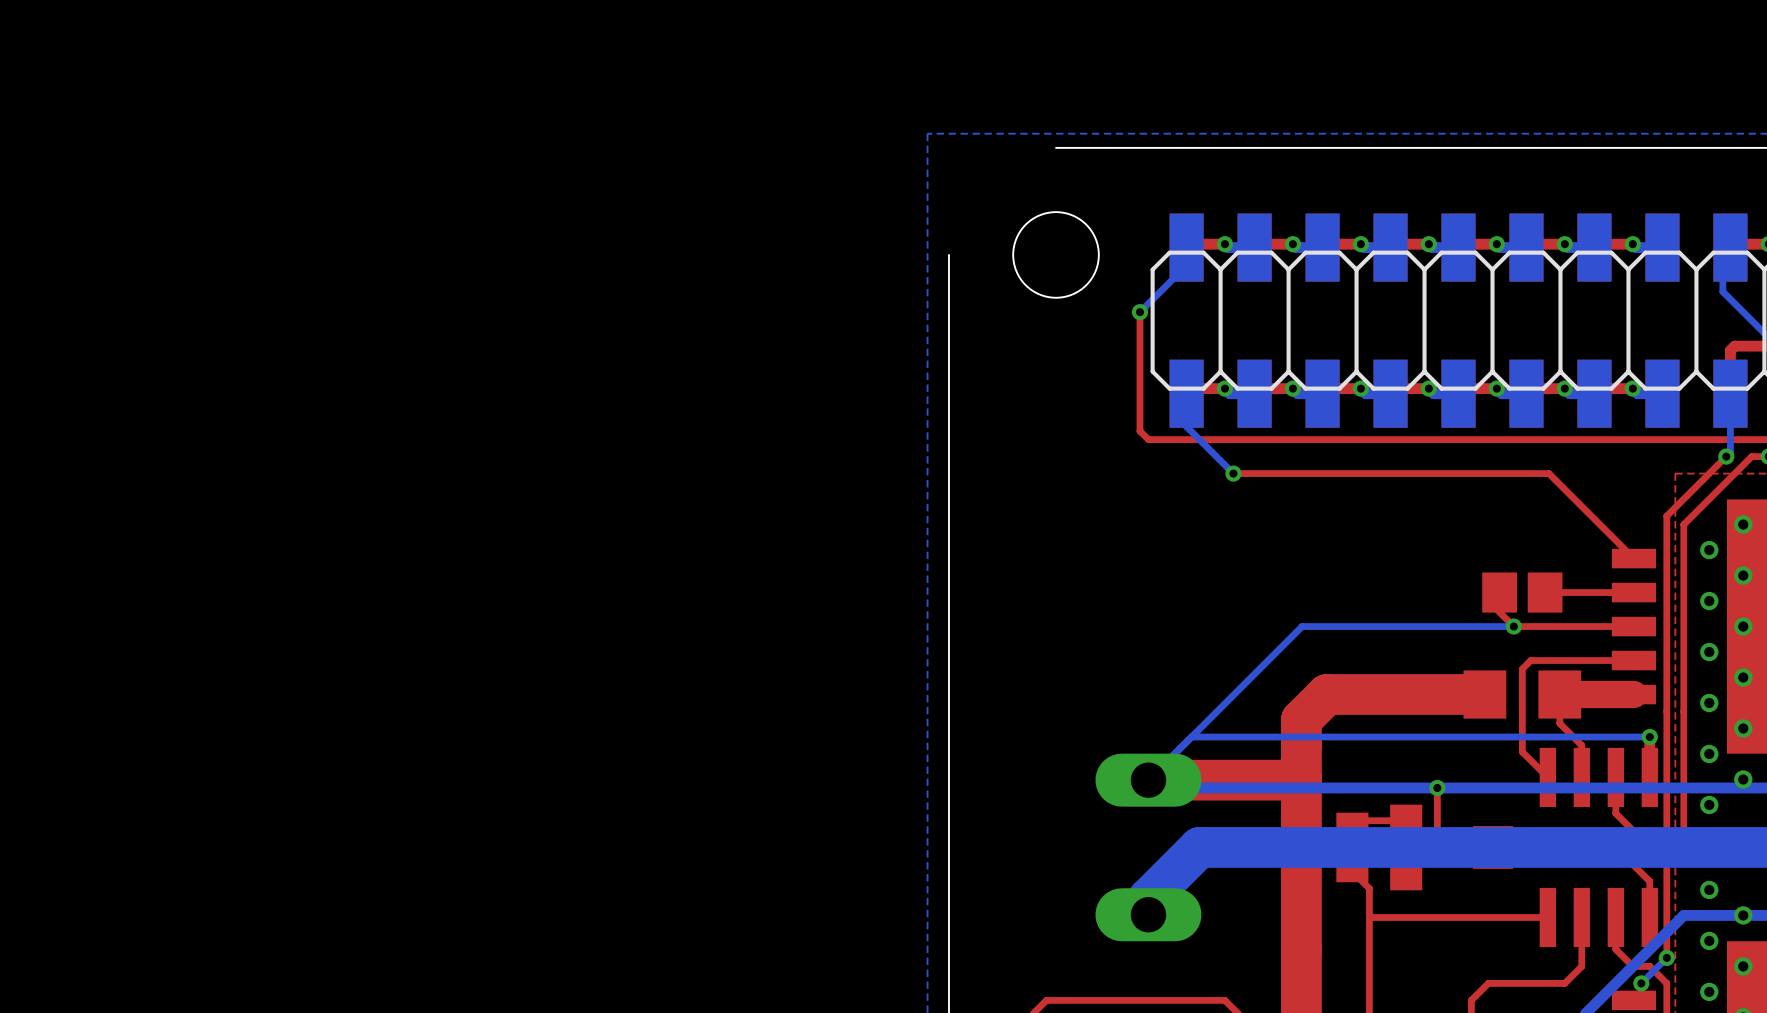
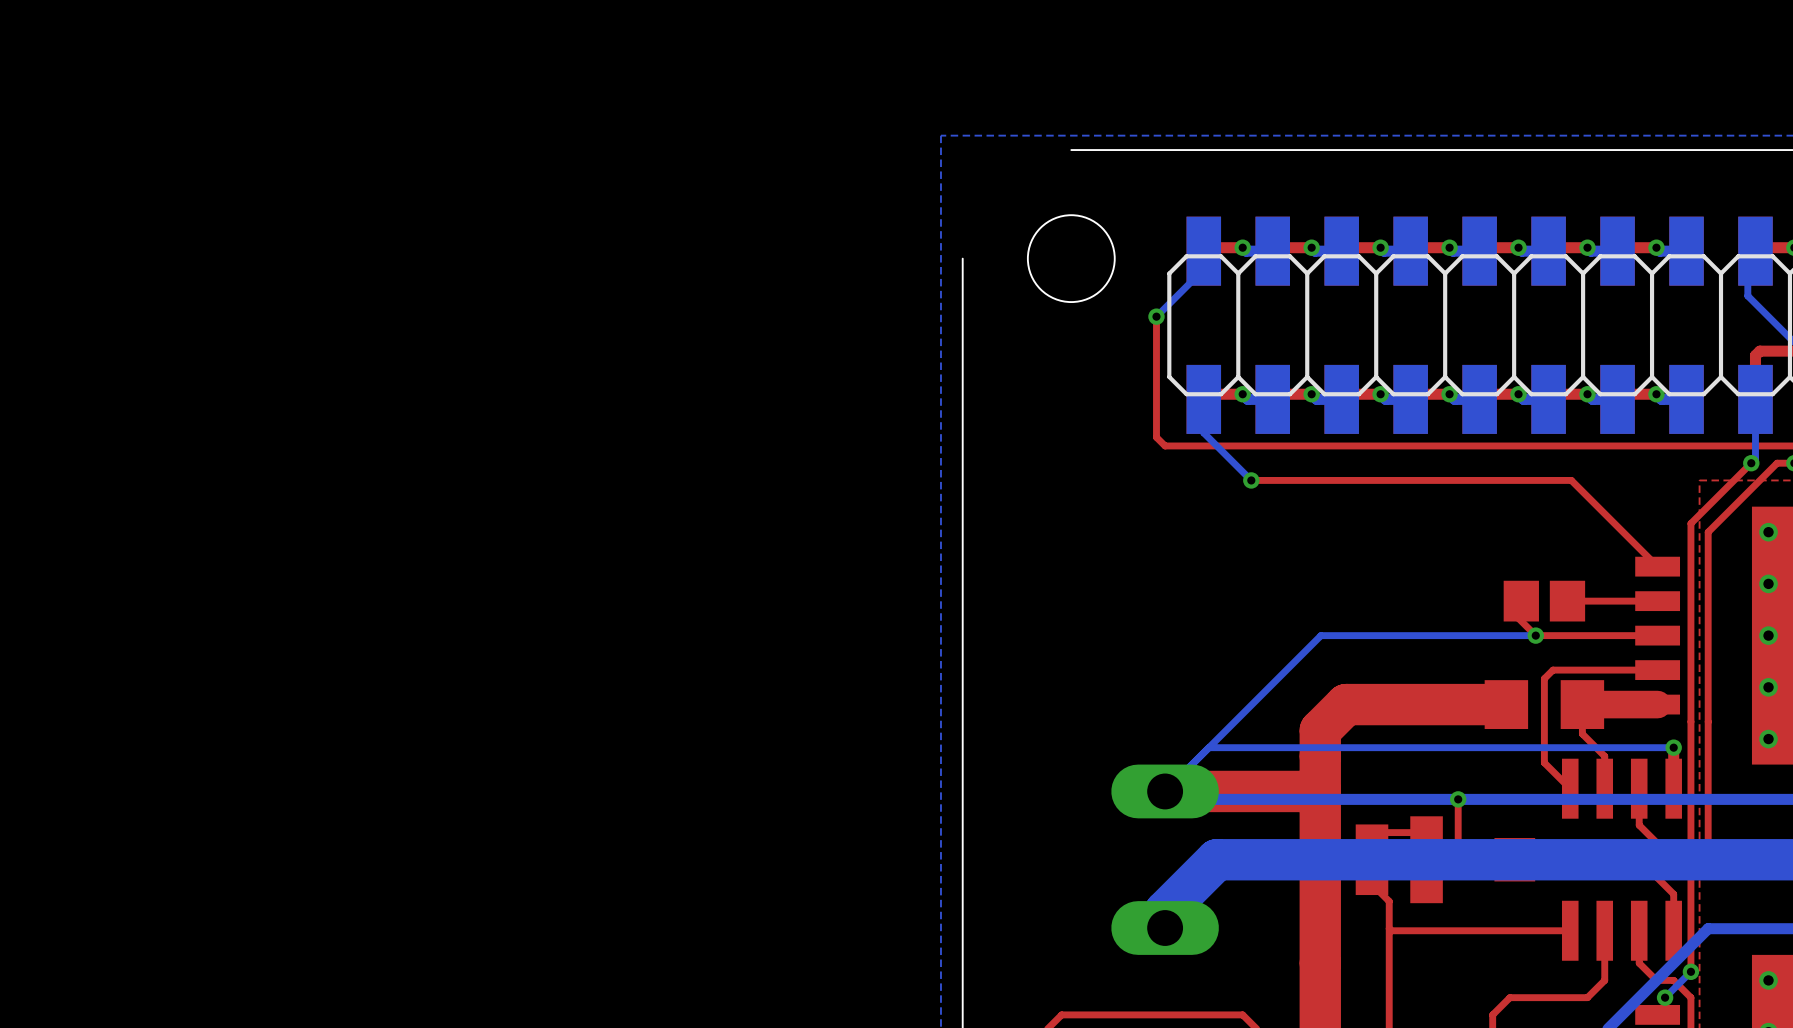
via: (1709, 550) -> none
via: (1709, 601) -> none
via: (1709, 652) -> none
via: (1709, 703) -> none
via: (1709, 753) -> none
via: (1743, 779) -> none
via: (1709, 804) -> none
via: (1709, 889) -> none
via: (1743, 915) -> none
via: (1709, 940) -> none
via: (1709, 991) -> none

